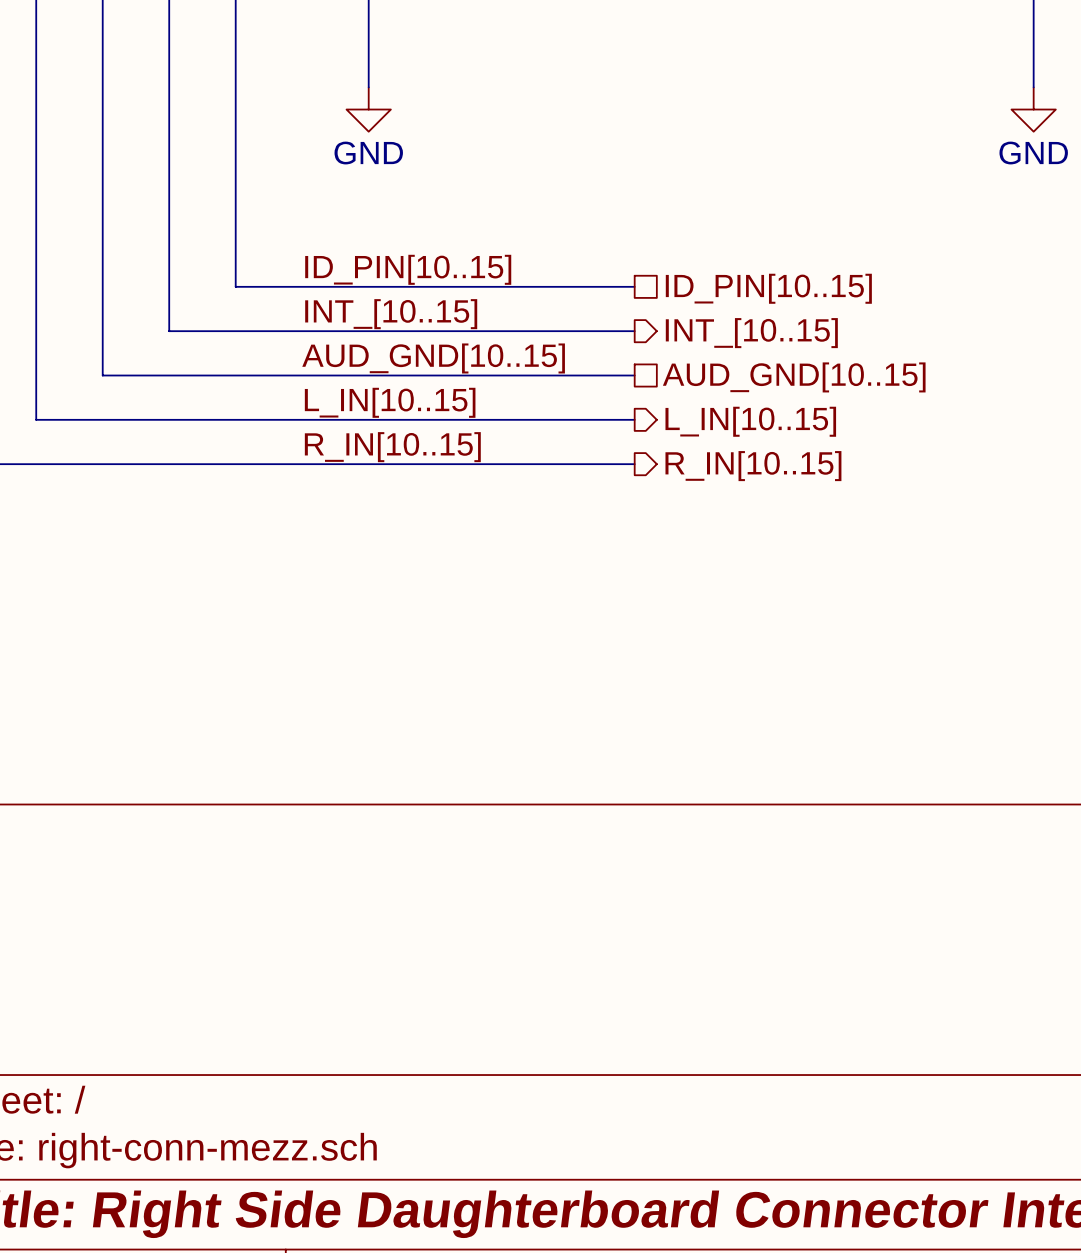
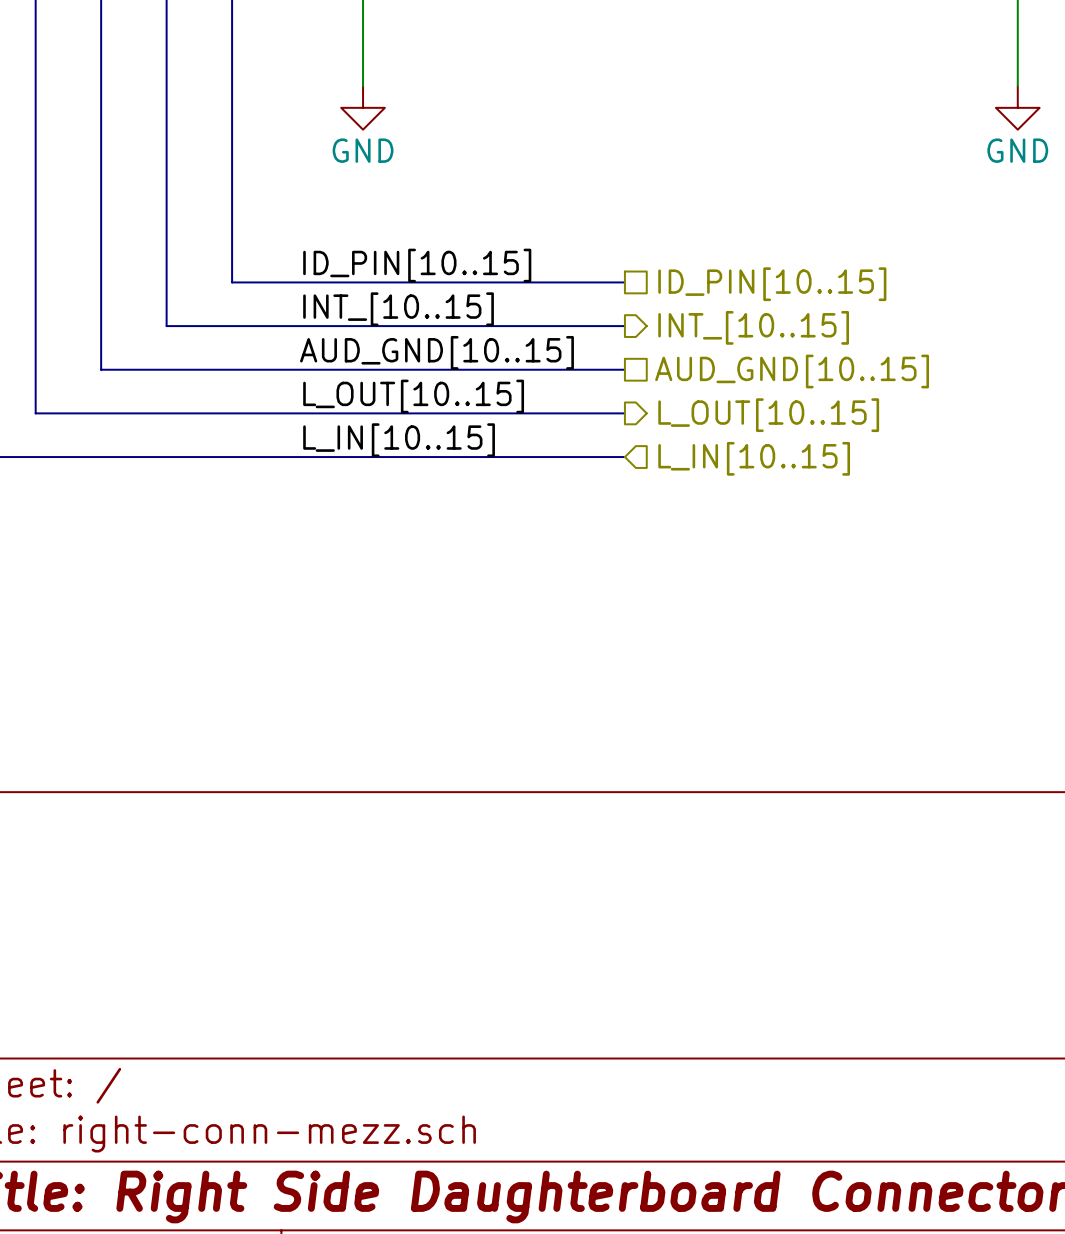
label: L_IN[10..15] (390, 402) -> L_OUT[10..15] (413, 396)
hierarchical label: L_IN[10..15] (750, 421) -> L_OUT[10..15] (768, 415)
label: R_IN[10..15] (392, 447) -> L_IN[10..15] (399, 440)
hierarchical label shape: output (753, 466) -> input (754, 458)
hierarchical label: R_IN[10..15] (753, 466) -> L_IN[10..15] (754, 458)

